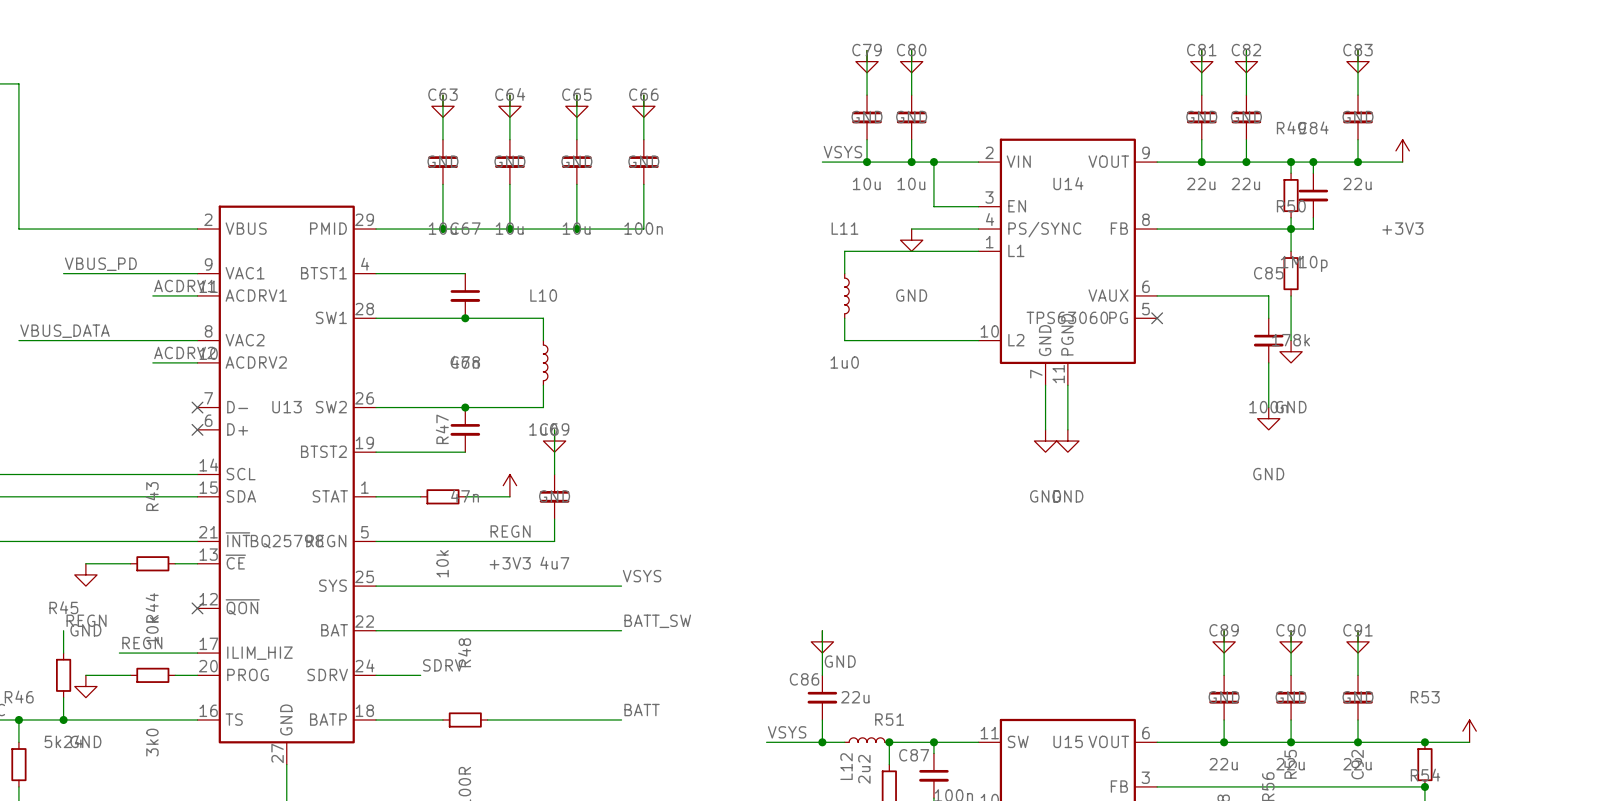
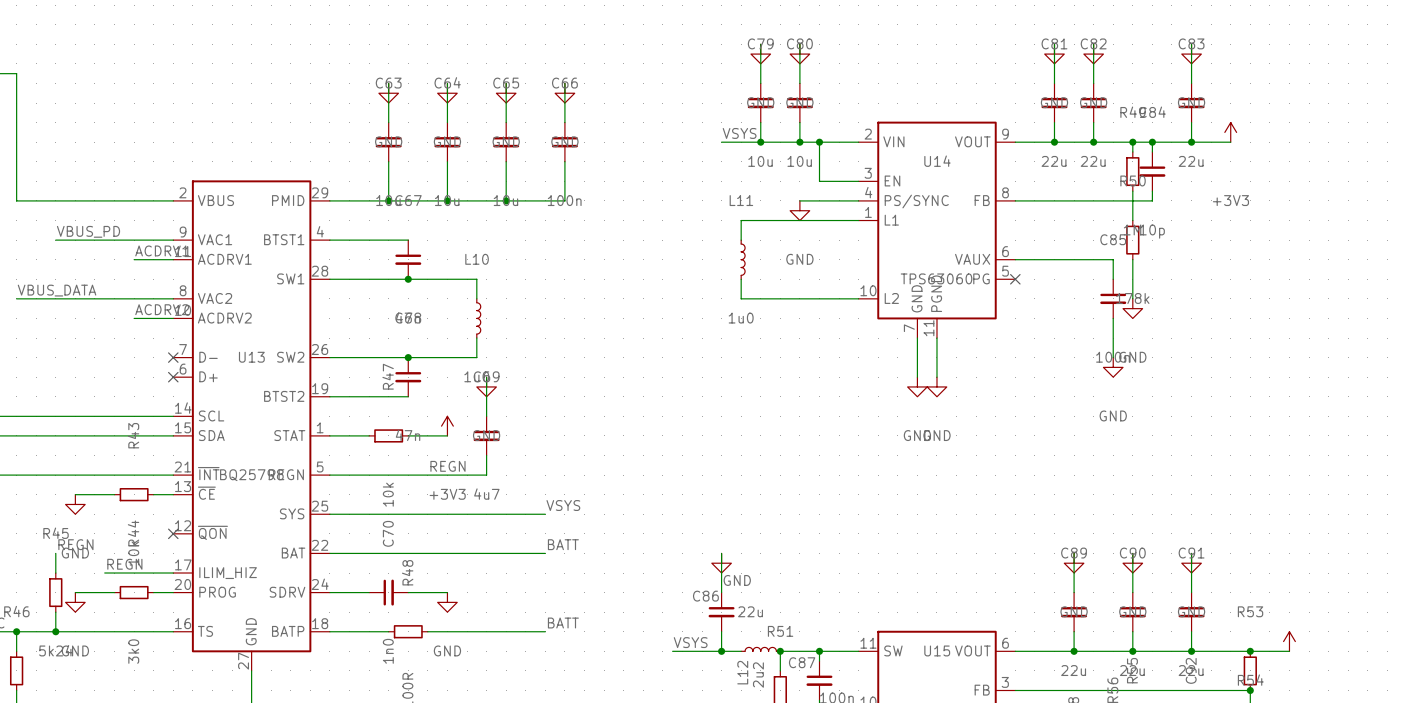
junction: (1291, 229) -> none
label: BATT_SW (657, 621) -> BATT (563, 544)
label: SDRV (443, 665) -> none
C70: none -> 1n0 (388, 592)
wire: none -> (408, 592) (447, 592)
power symbol: none -> GND (447, 602)

